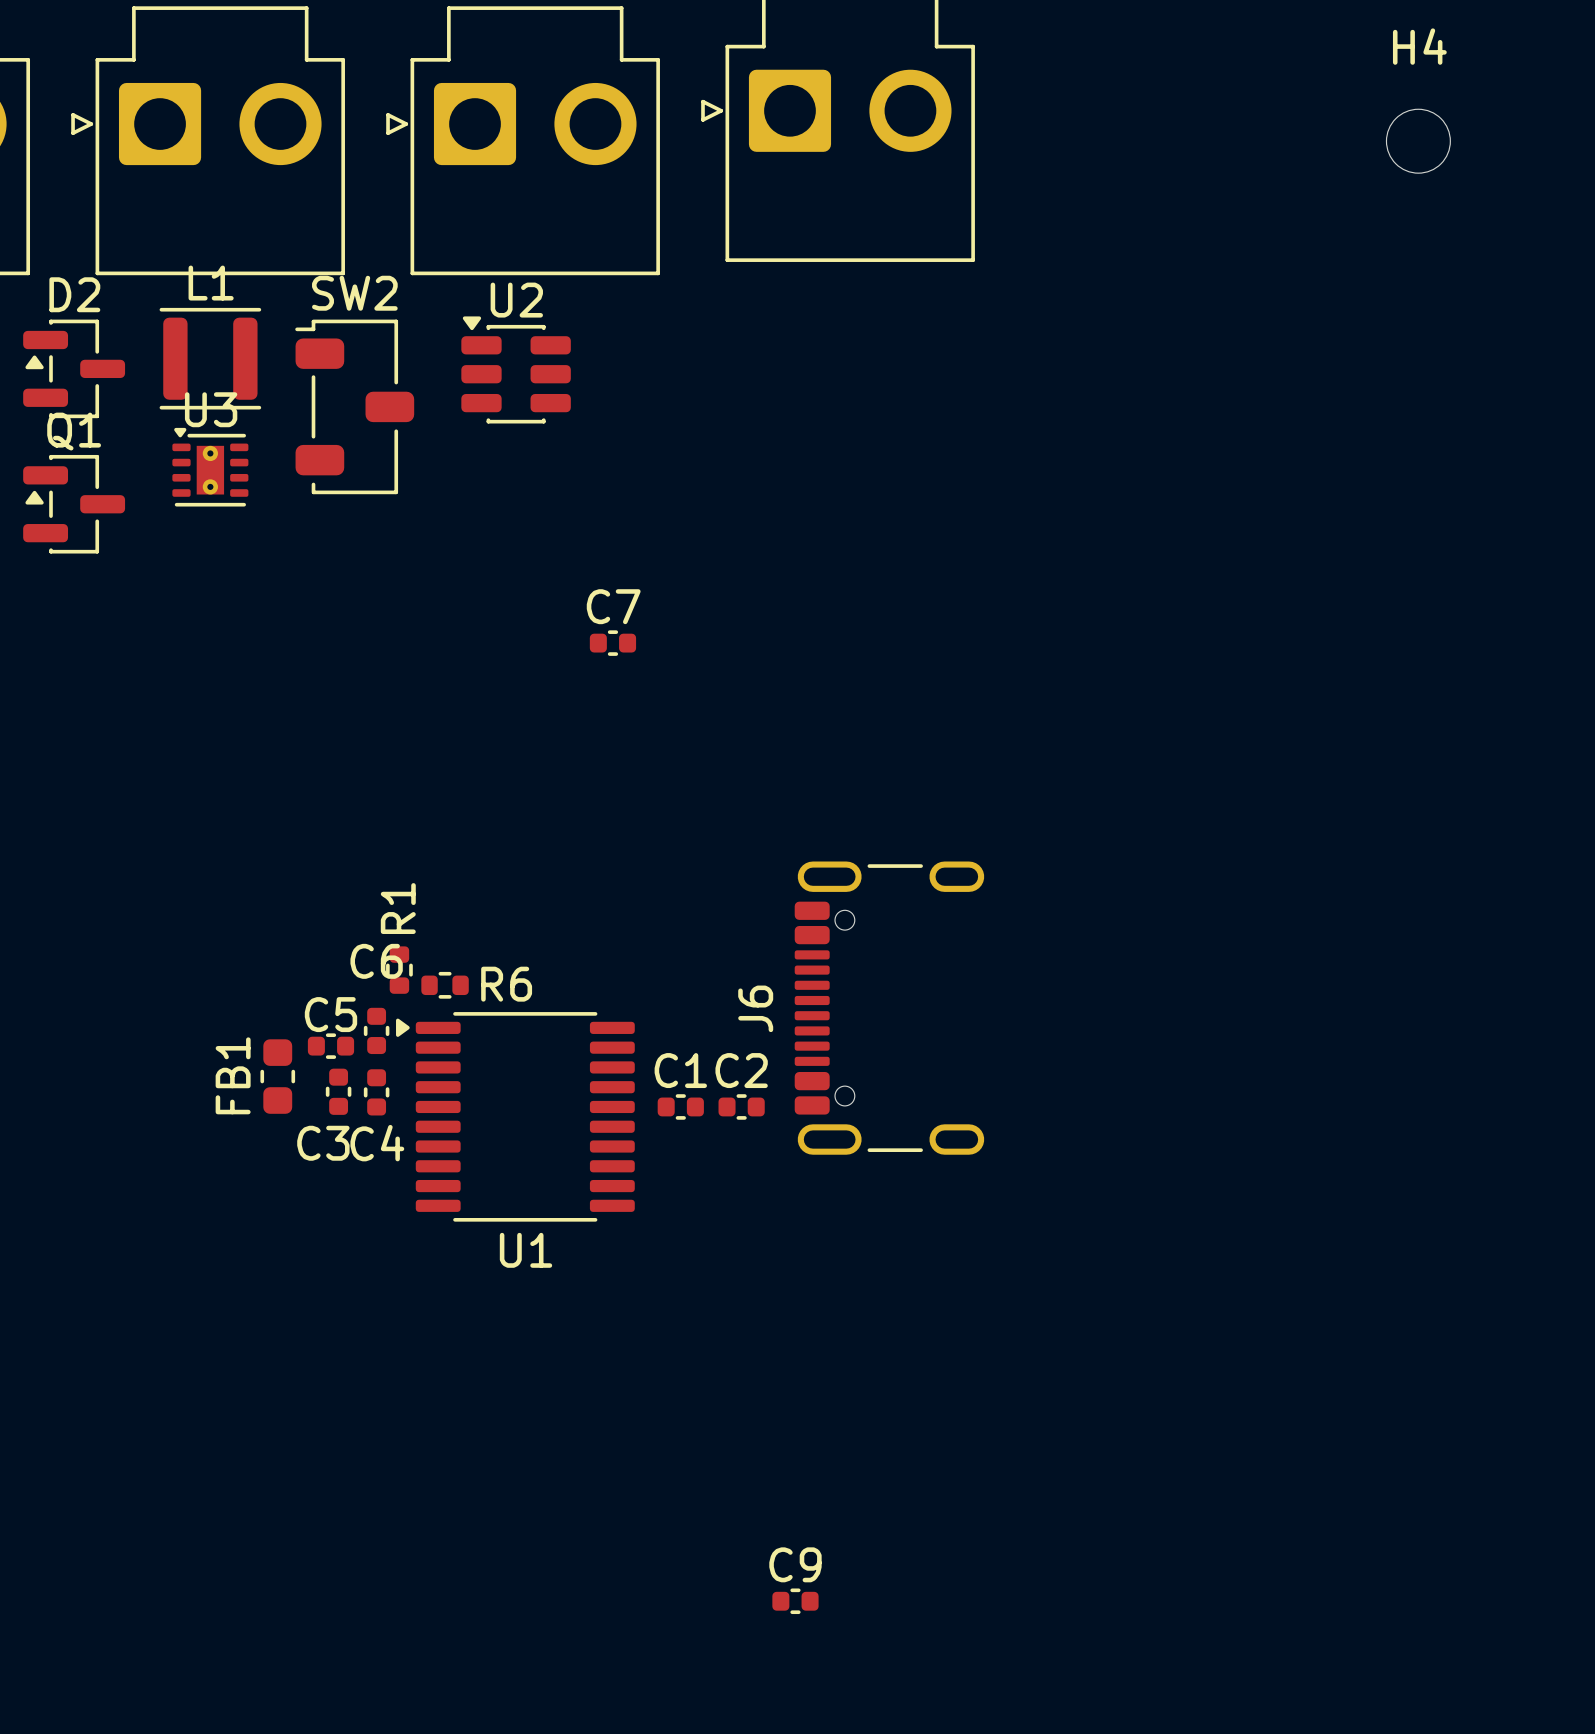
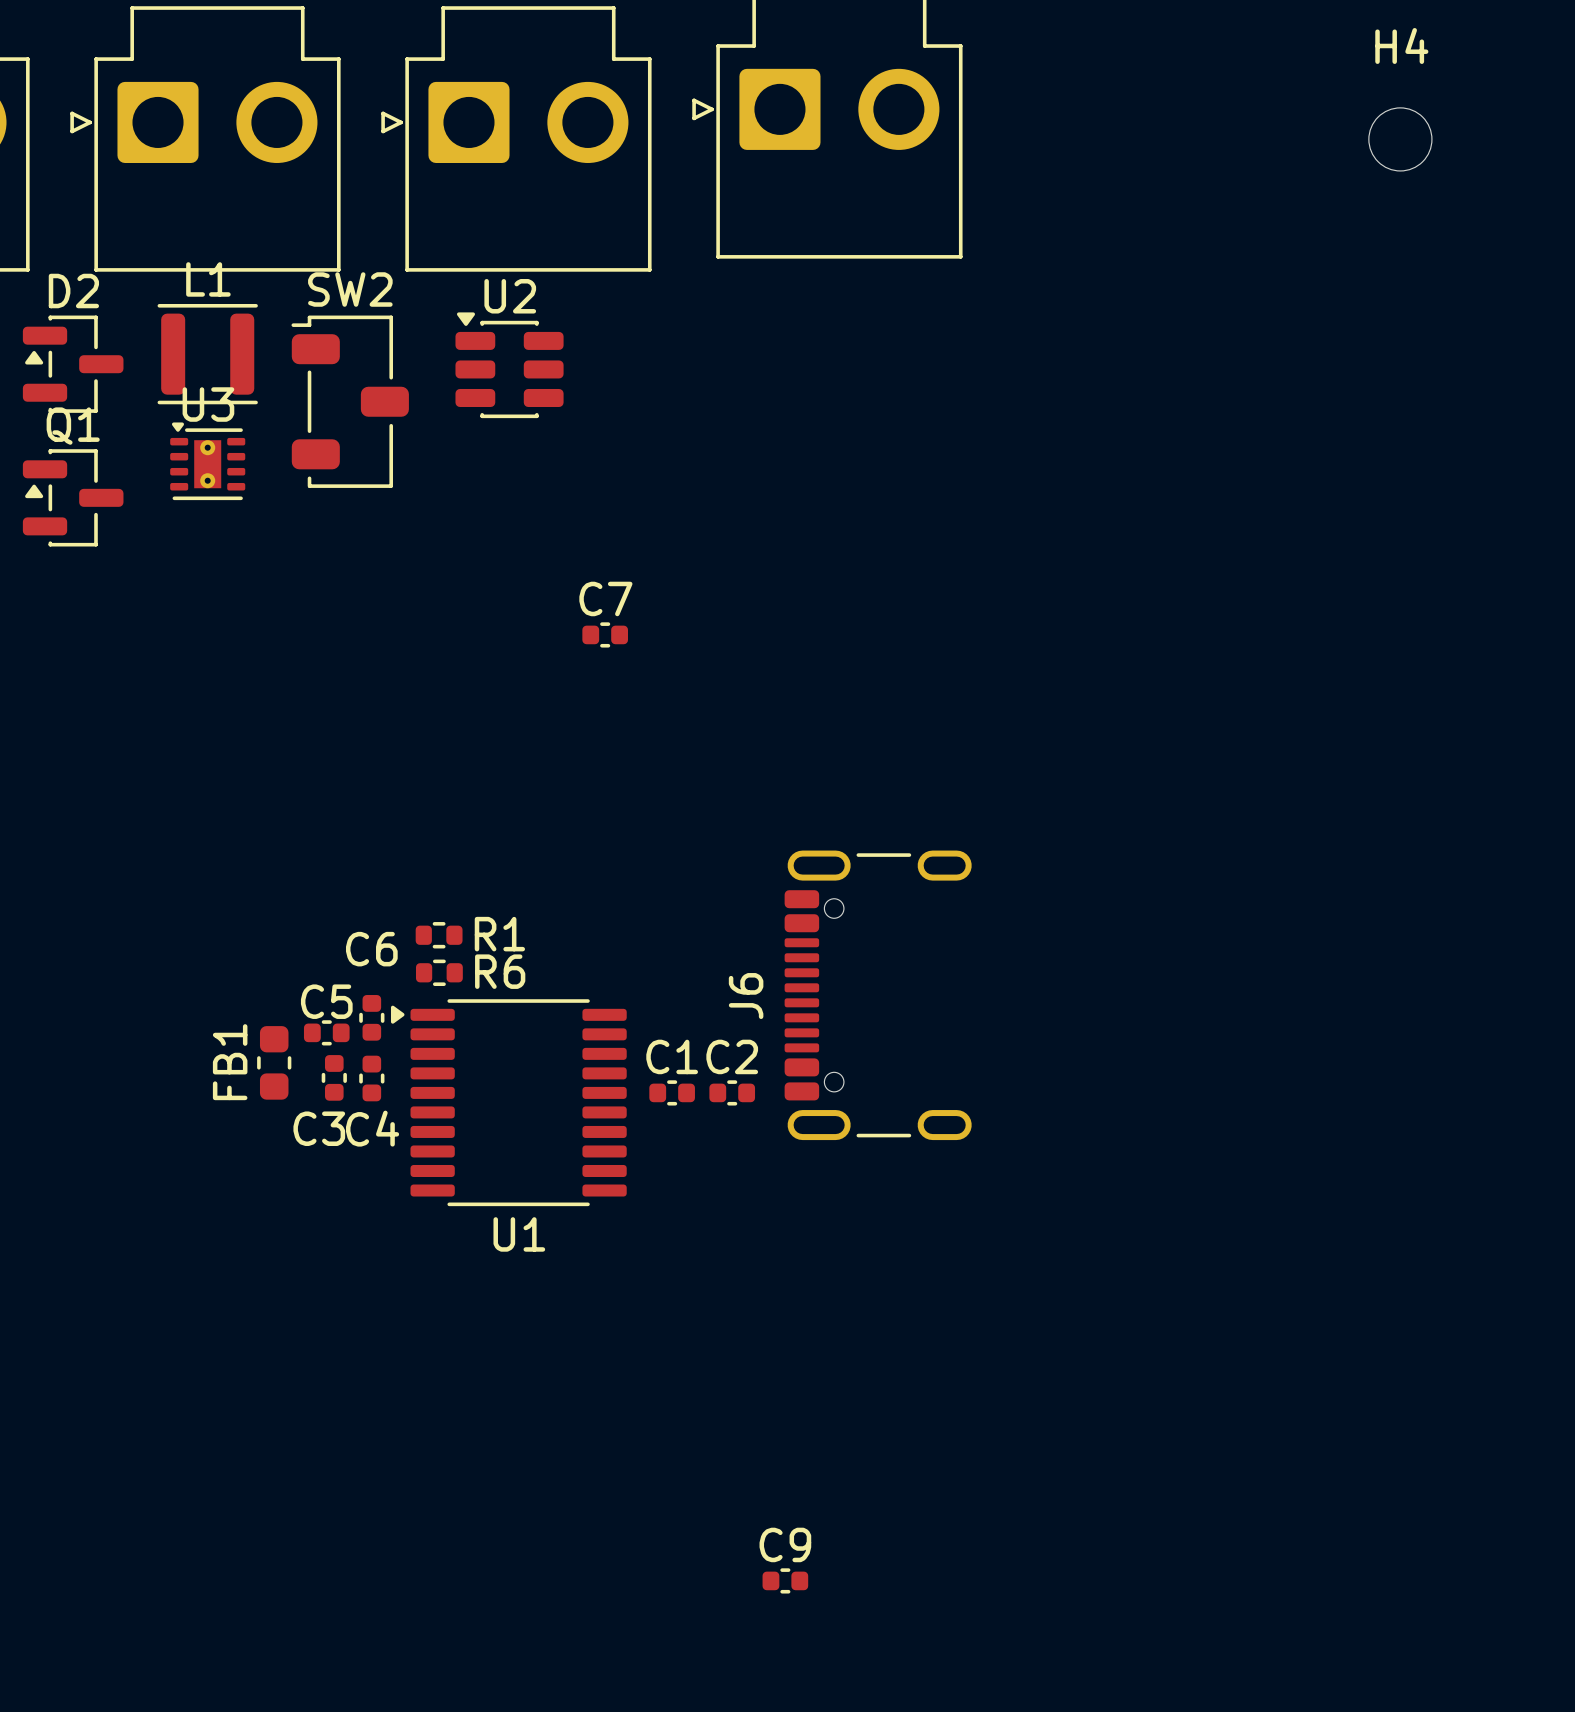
R1 rotation: 0° (399, 970) -> 90° clockwise (439, 935)
R1 position: (399, 970) -> (439, 935)

